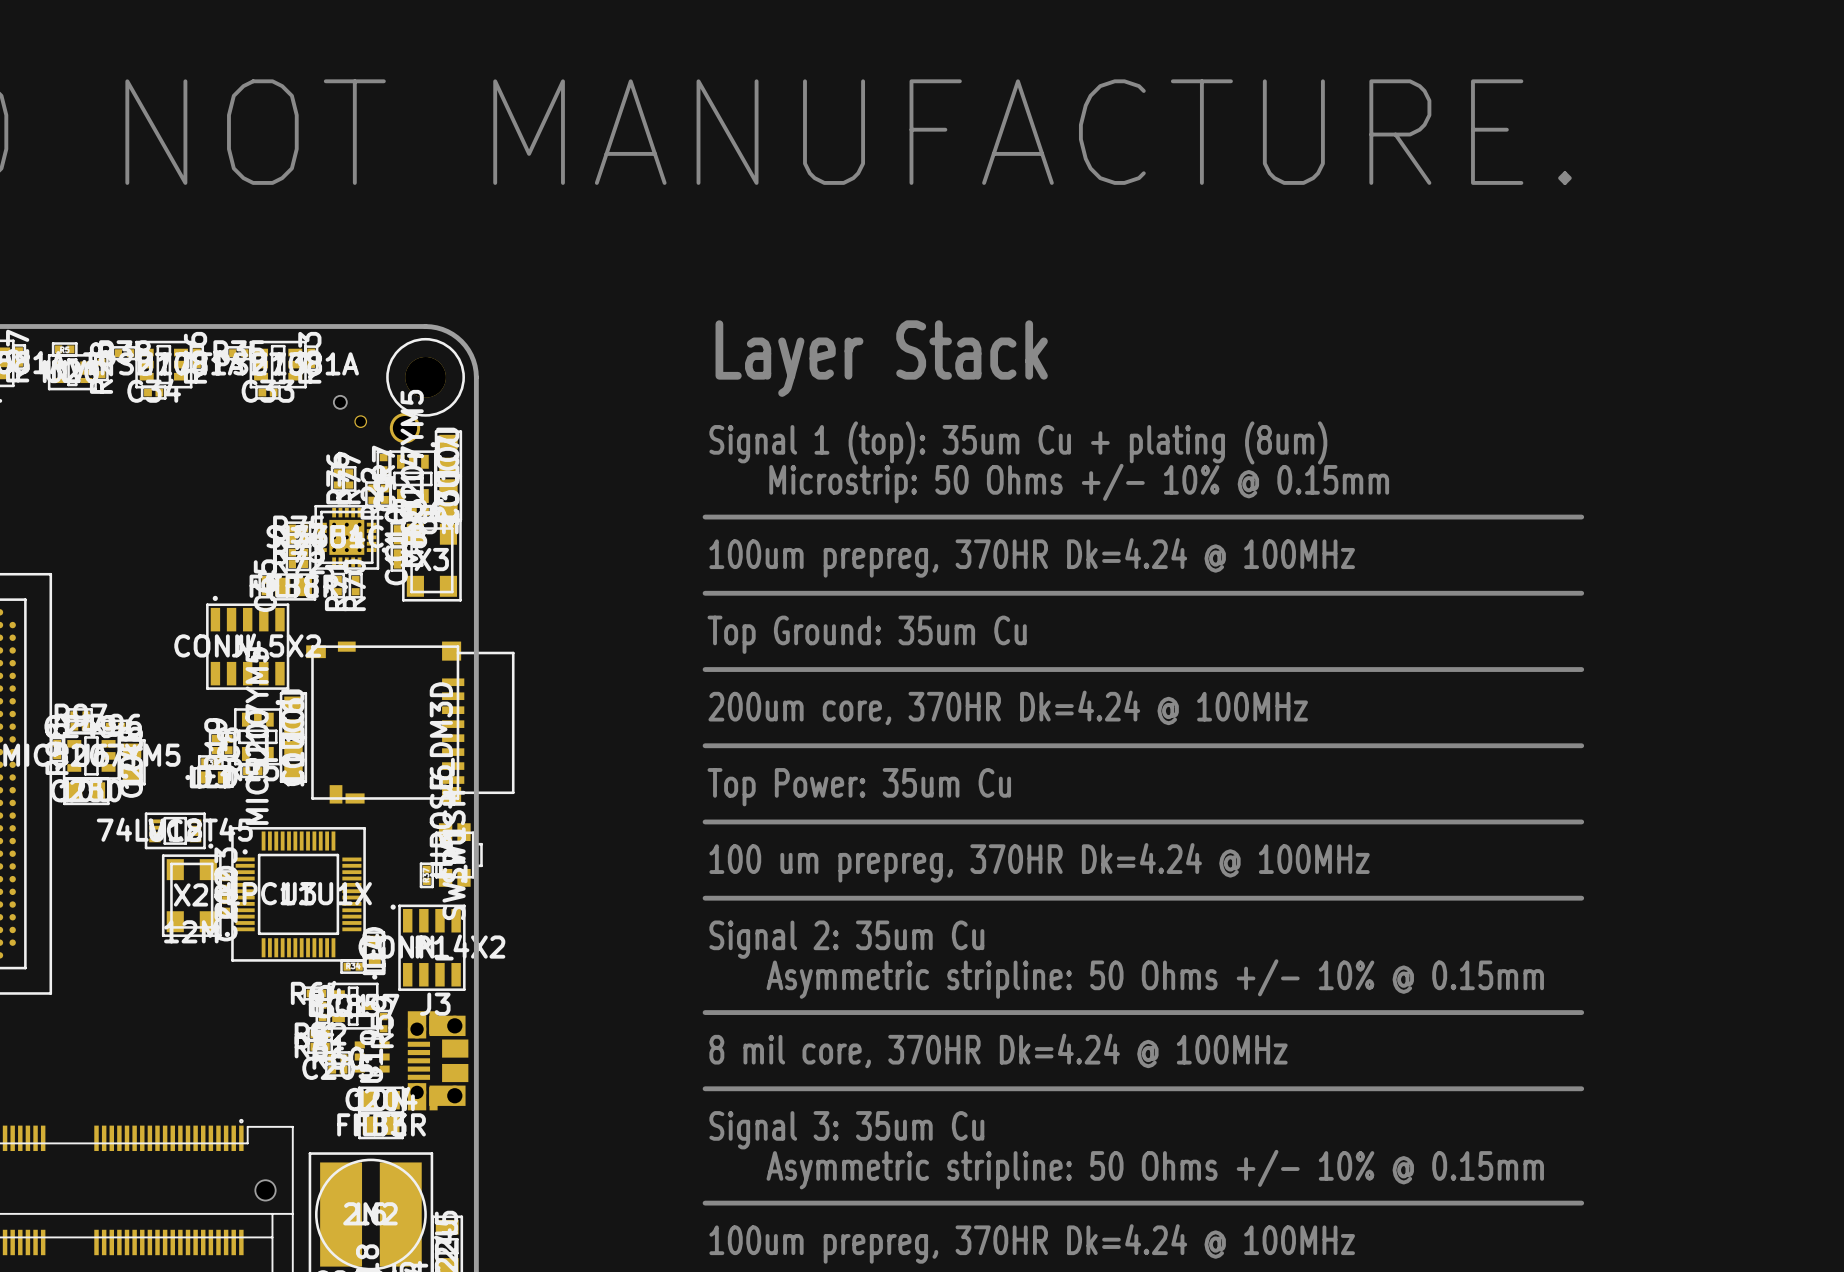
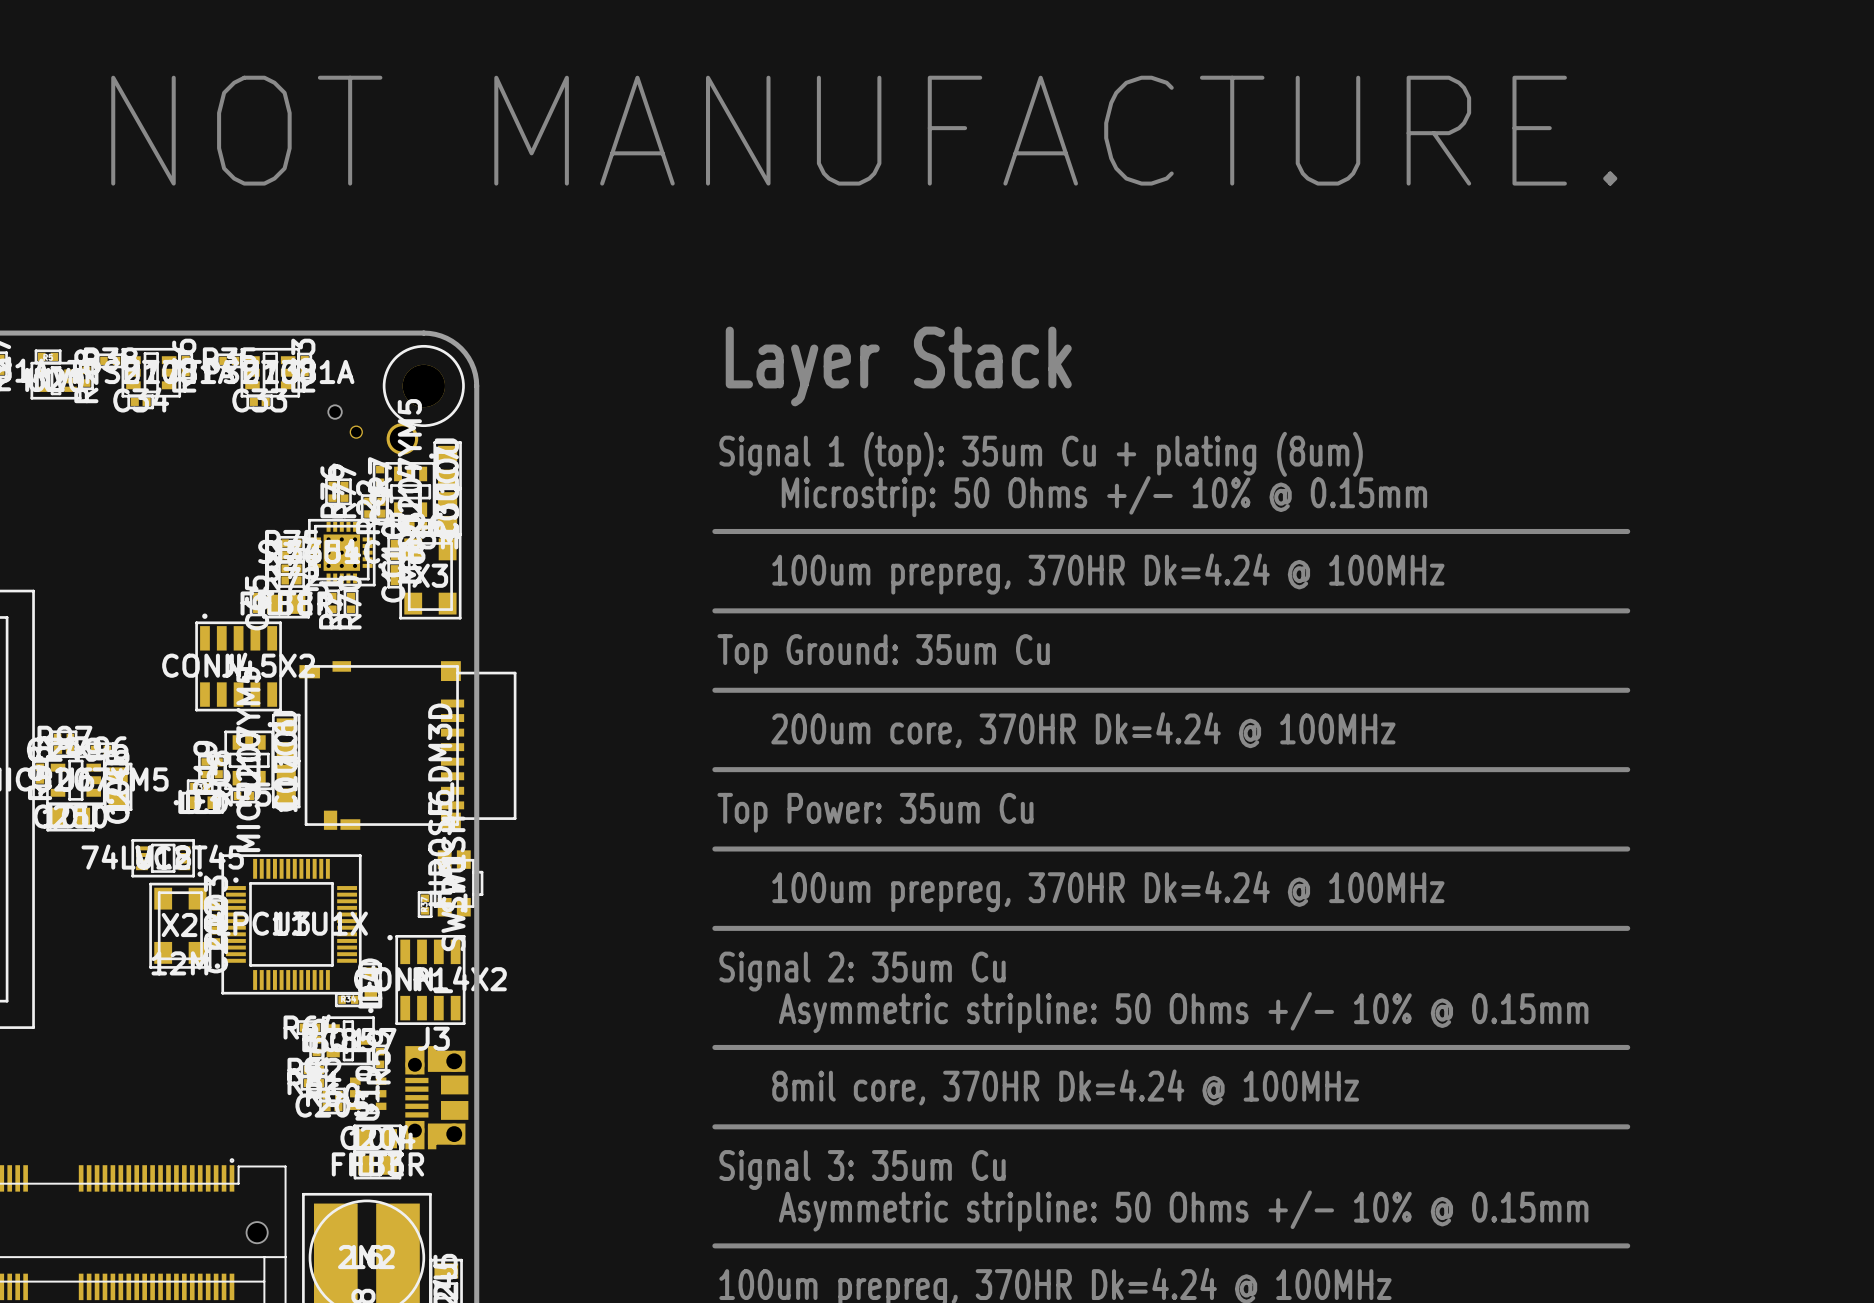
text position: 100um prepreg, 370HR Dk=4.24 @ 100MHz (1032, 557) -> 100um prepreg, 370HR Dk=4.24 @ 100MHz (1108, 574)
text position: 200um core, 370HR Dk=4.24 @ 100MHz (1008, 707) -> 200um core, 370HR Dk=4.24 @ 100MHz (1083, 730)
text: 100 um prepreg, 370HR Dk=4.24 @ 100MHz (1039, 862) -> 100um prepreg, 370HR Dk=4.24 @ 100MHz (1108, 891)
text: 8 mil core, 370HR Dk=4.24 @ 100MHz (998, 1050) -> 8mil core, 370HR Dk=4.24 @ 100MHz (1065, 1087)

